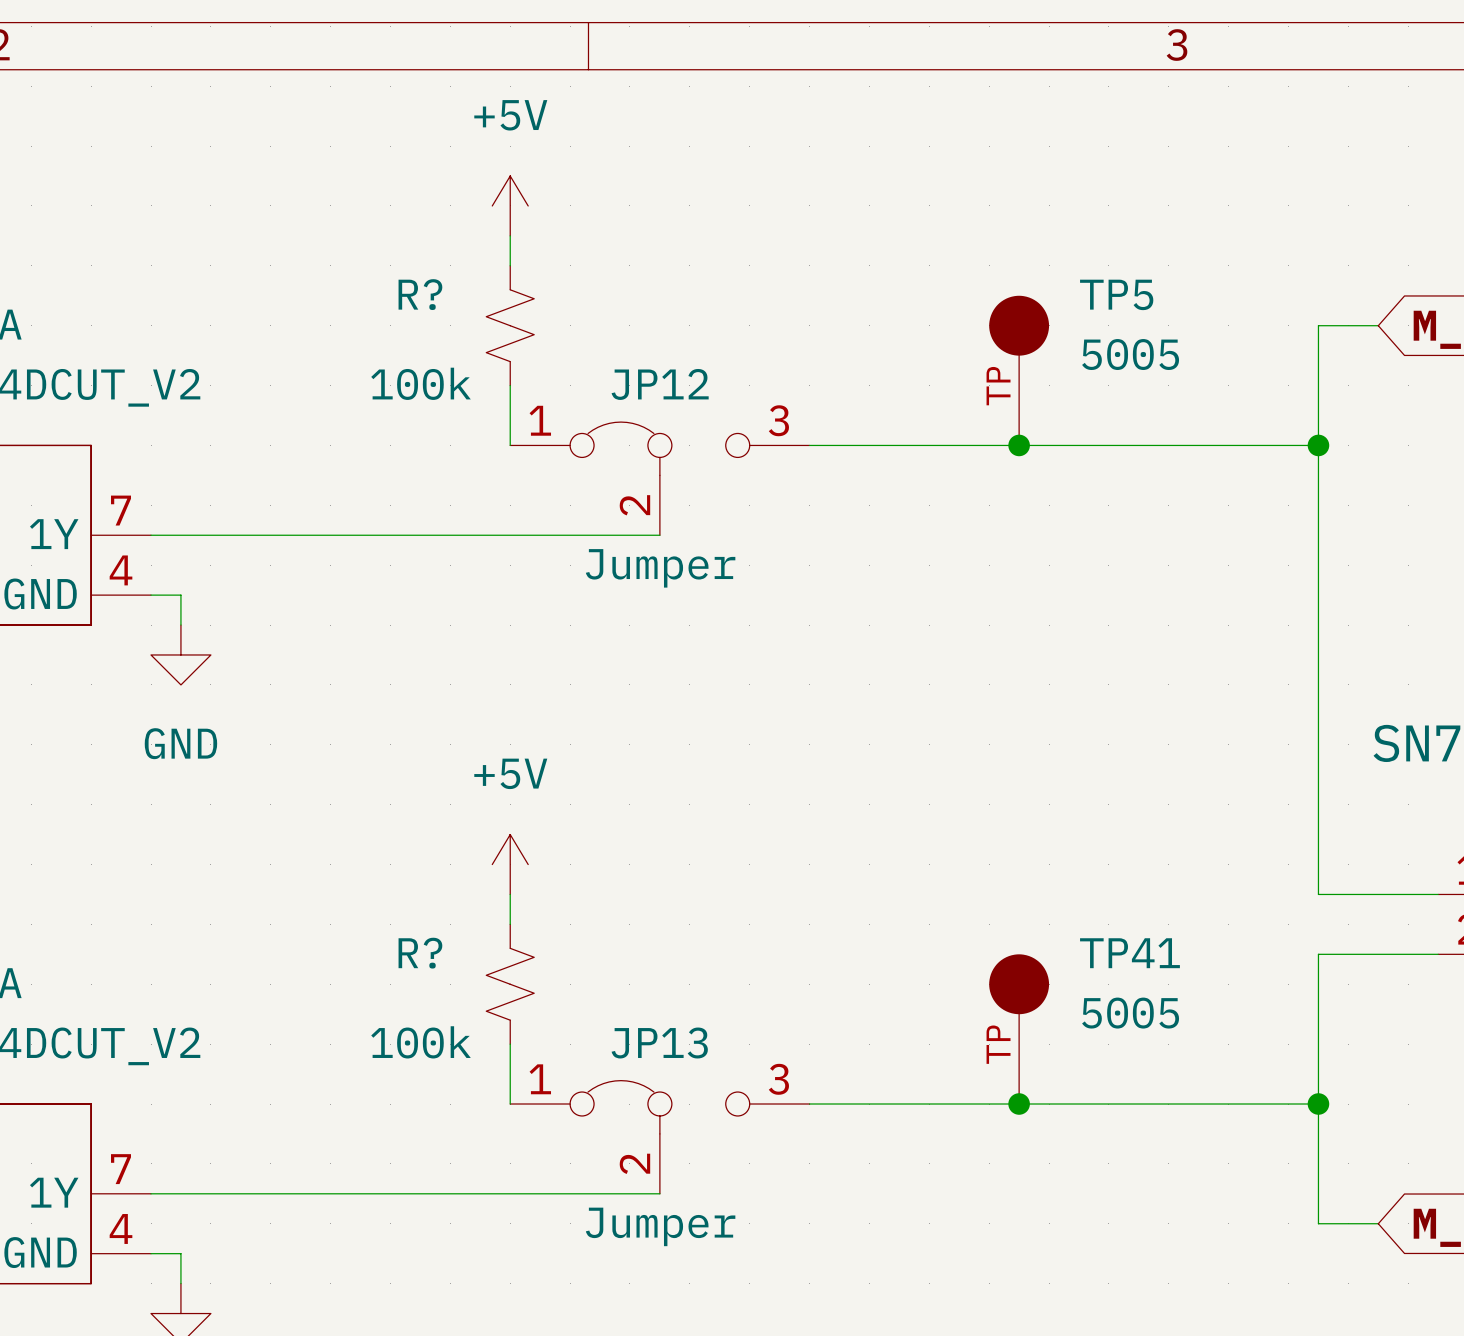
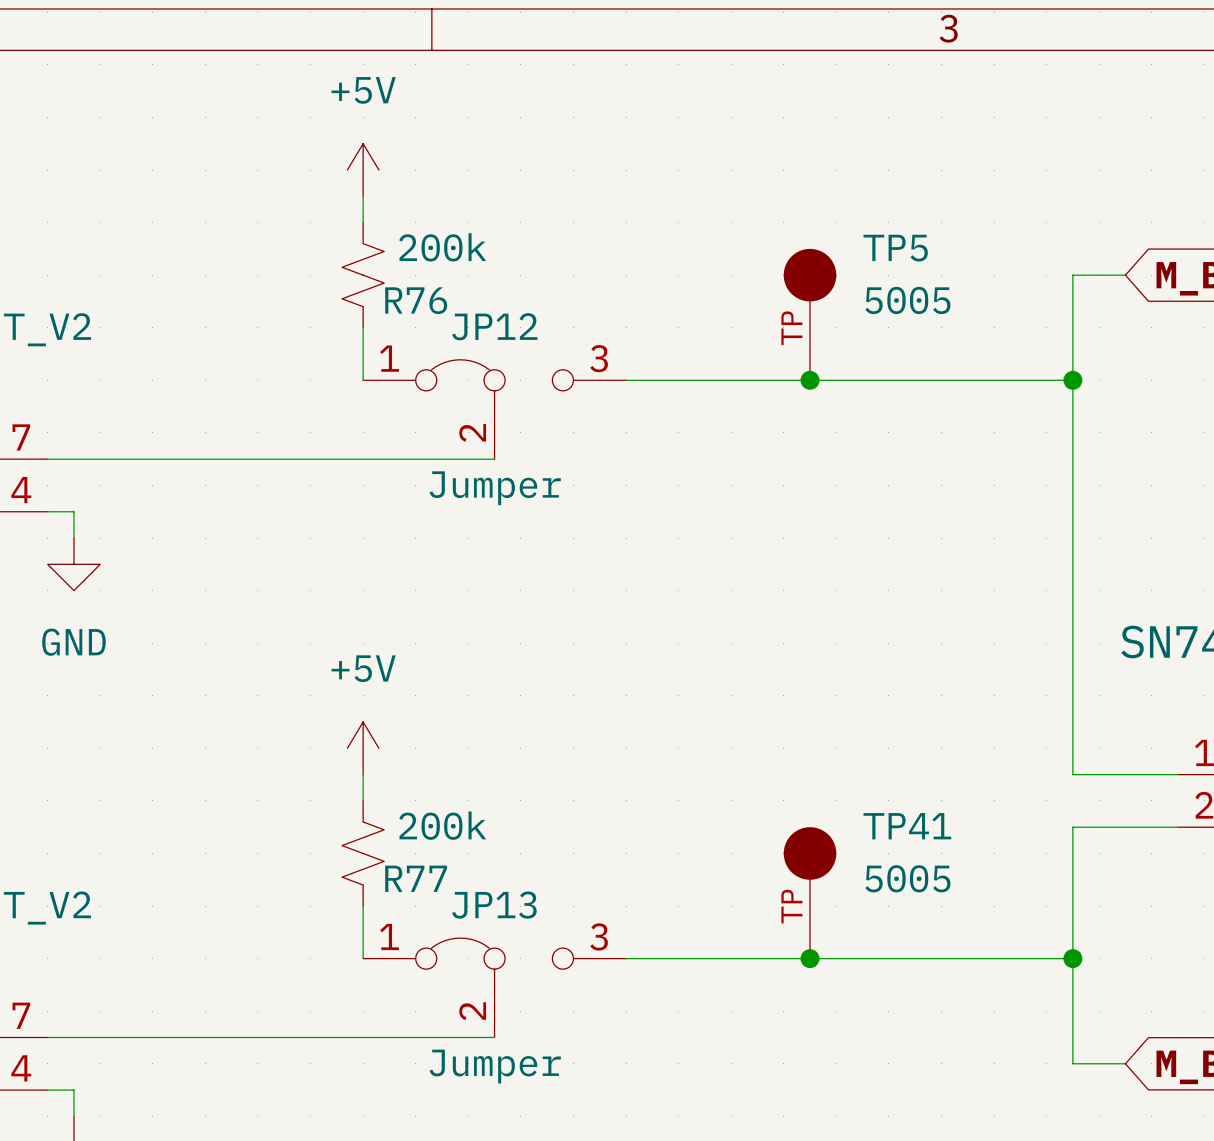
R? name: R? (420, 294) -> R76 (416, 300)
R? value: 100k (421, 383) -> 200k (442, 247)
R? name: R? (420, 953) -> R77 (416, 878)
R? value: 100k (421, 1042) -> 200k (442, 825)

